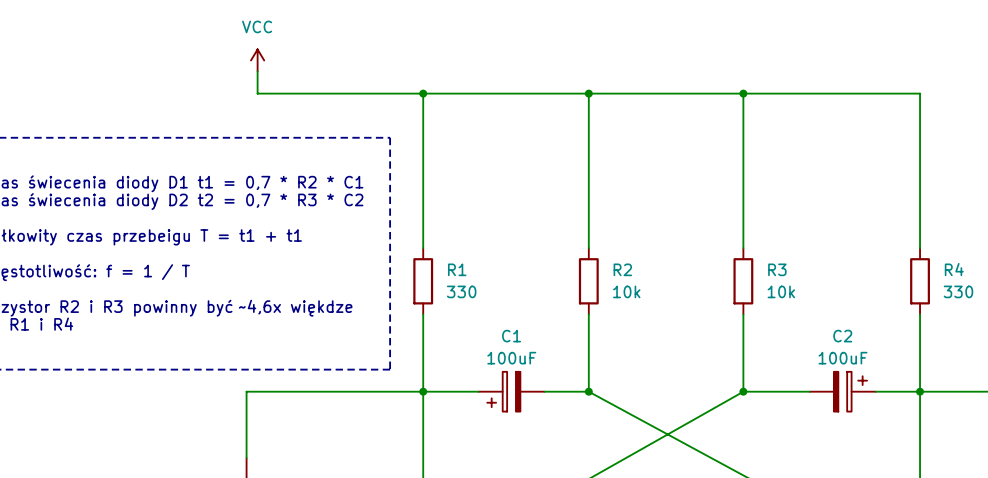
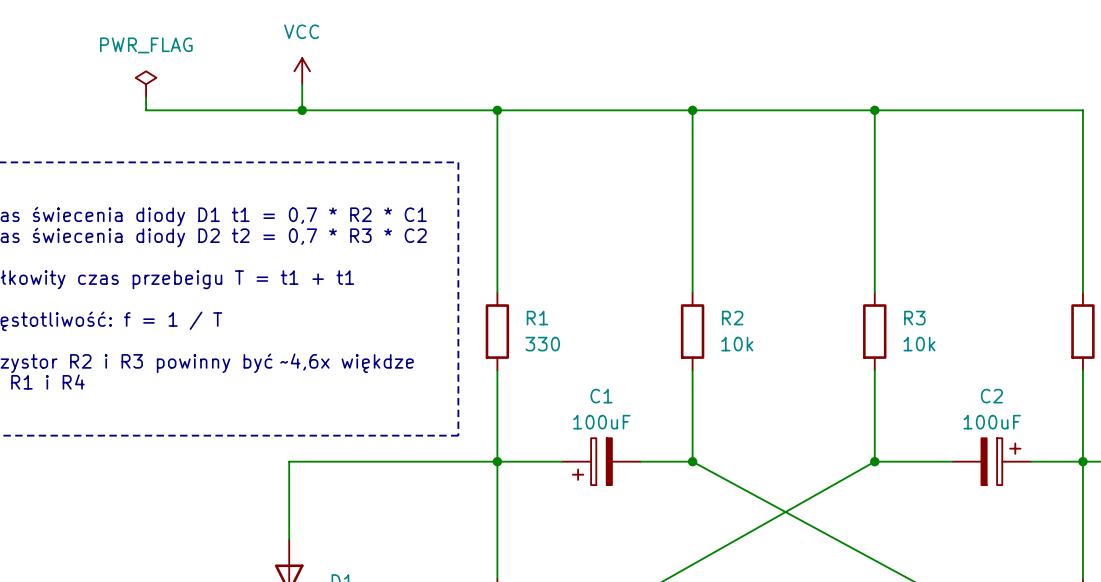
power symbol: none -> PWR_FLAG (146, 84)
wire: none -> (146, 97) (146, 110) (302, 110)
junction: none -> (302, 110)

